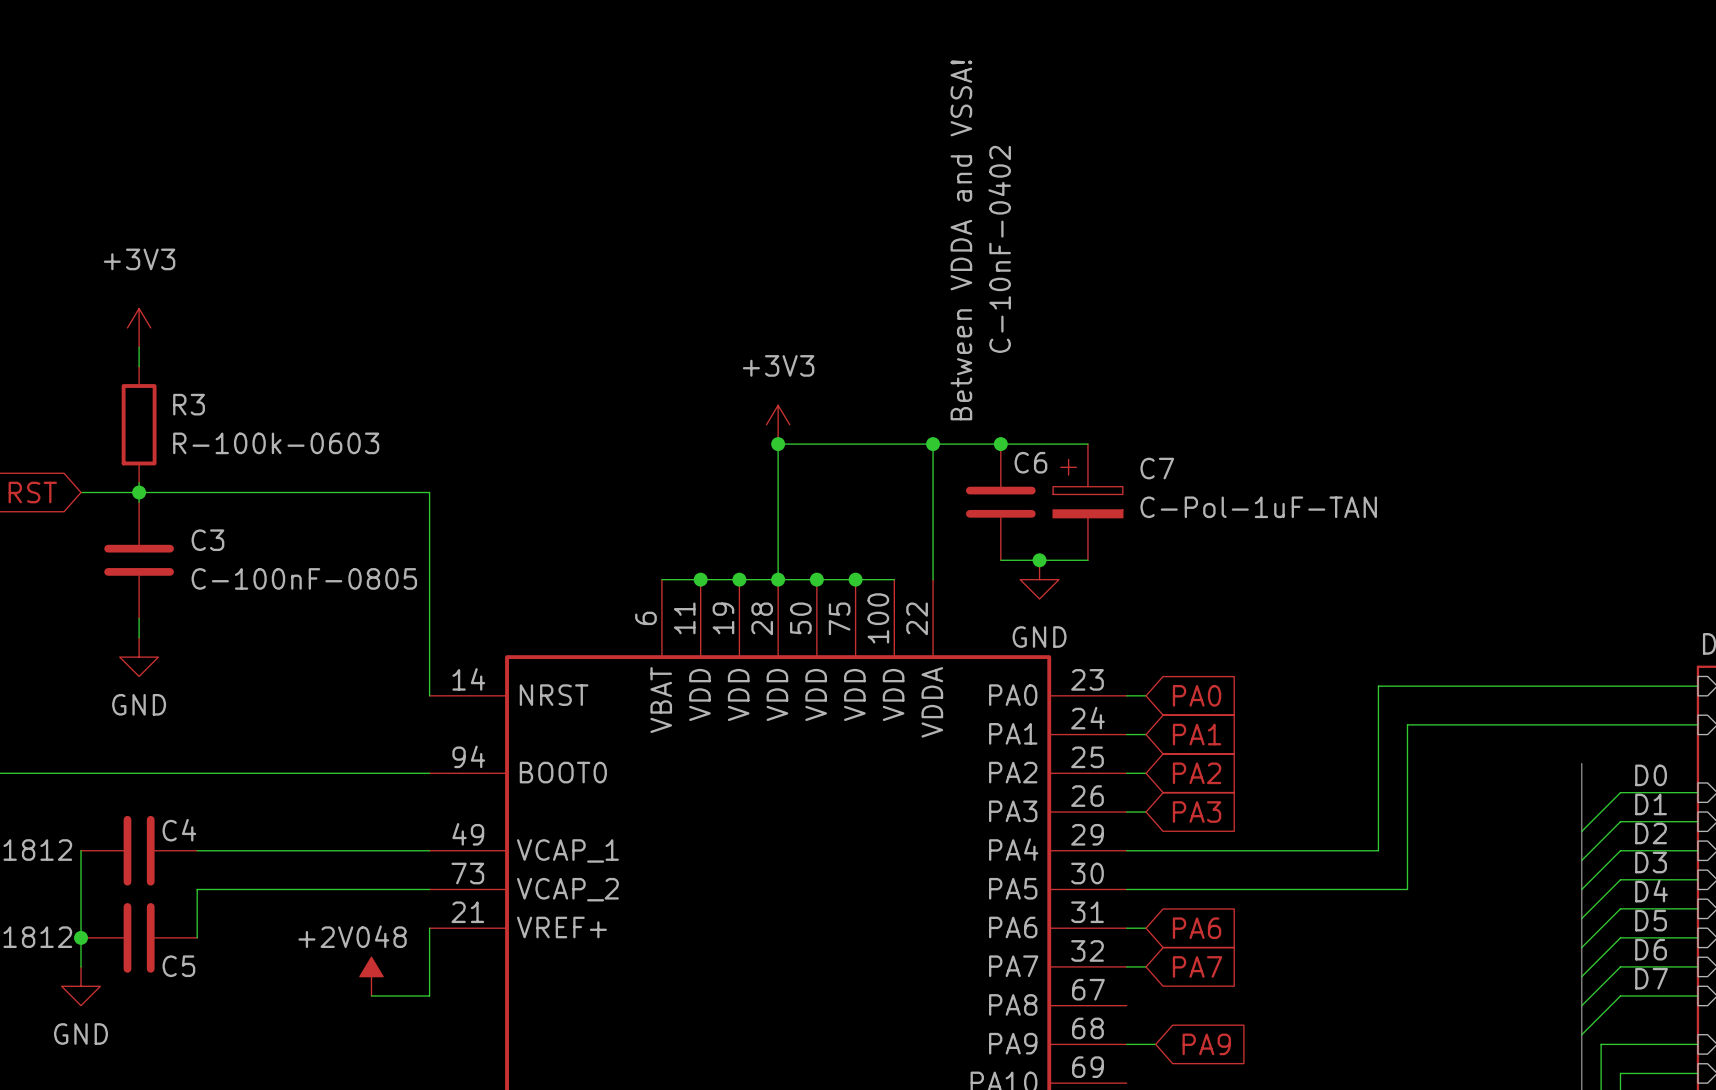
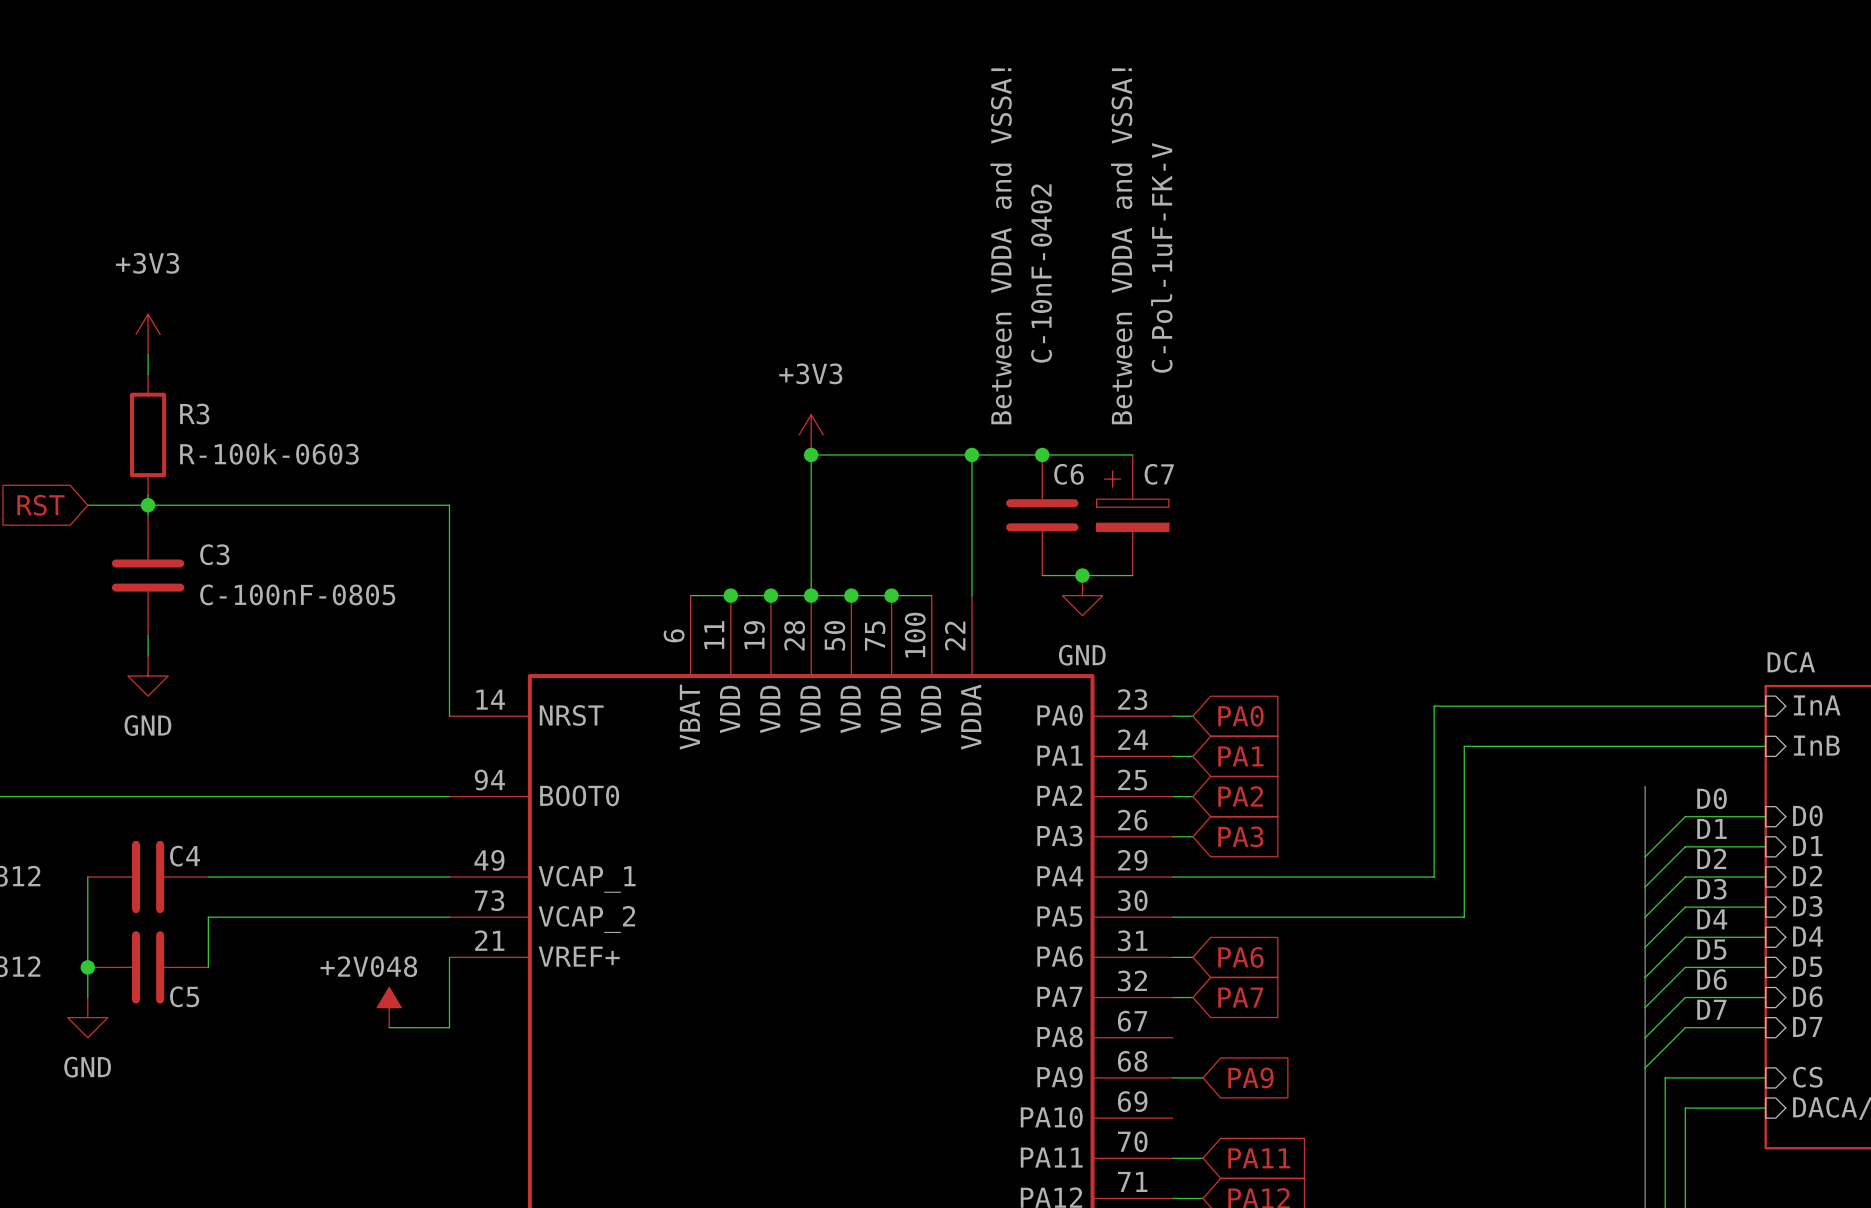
C7 text: none -> Between VDDA and VSSA! (1121, 246)
C7 name position: C7 (1157, 468) -> C7 (1159, 474)
C7 value: C-Pol-1uF-TAN (1258, 507) -> C-Pol-1uF-FK-V (1161, 257)

